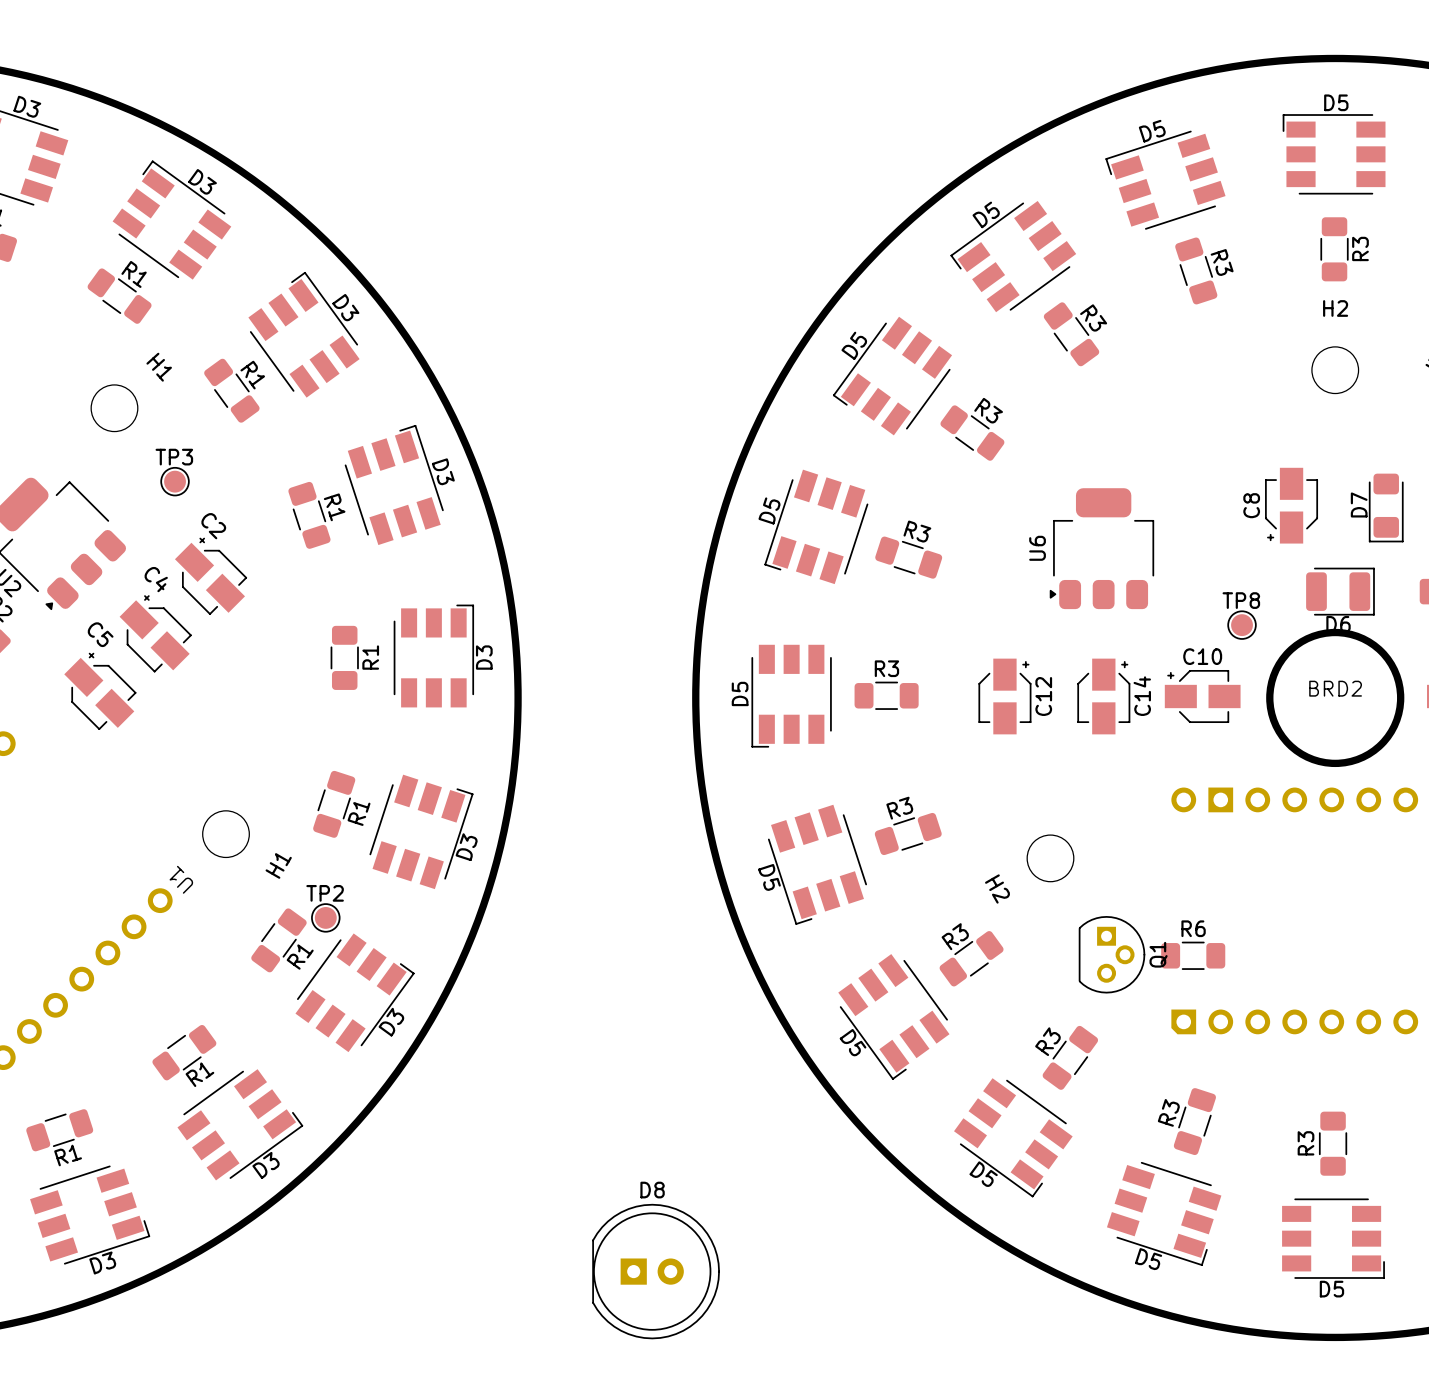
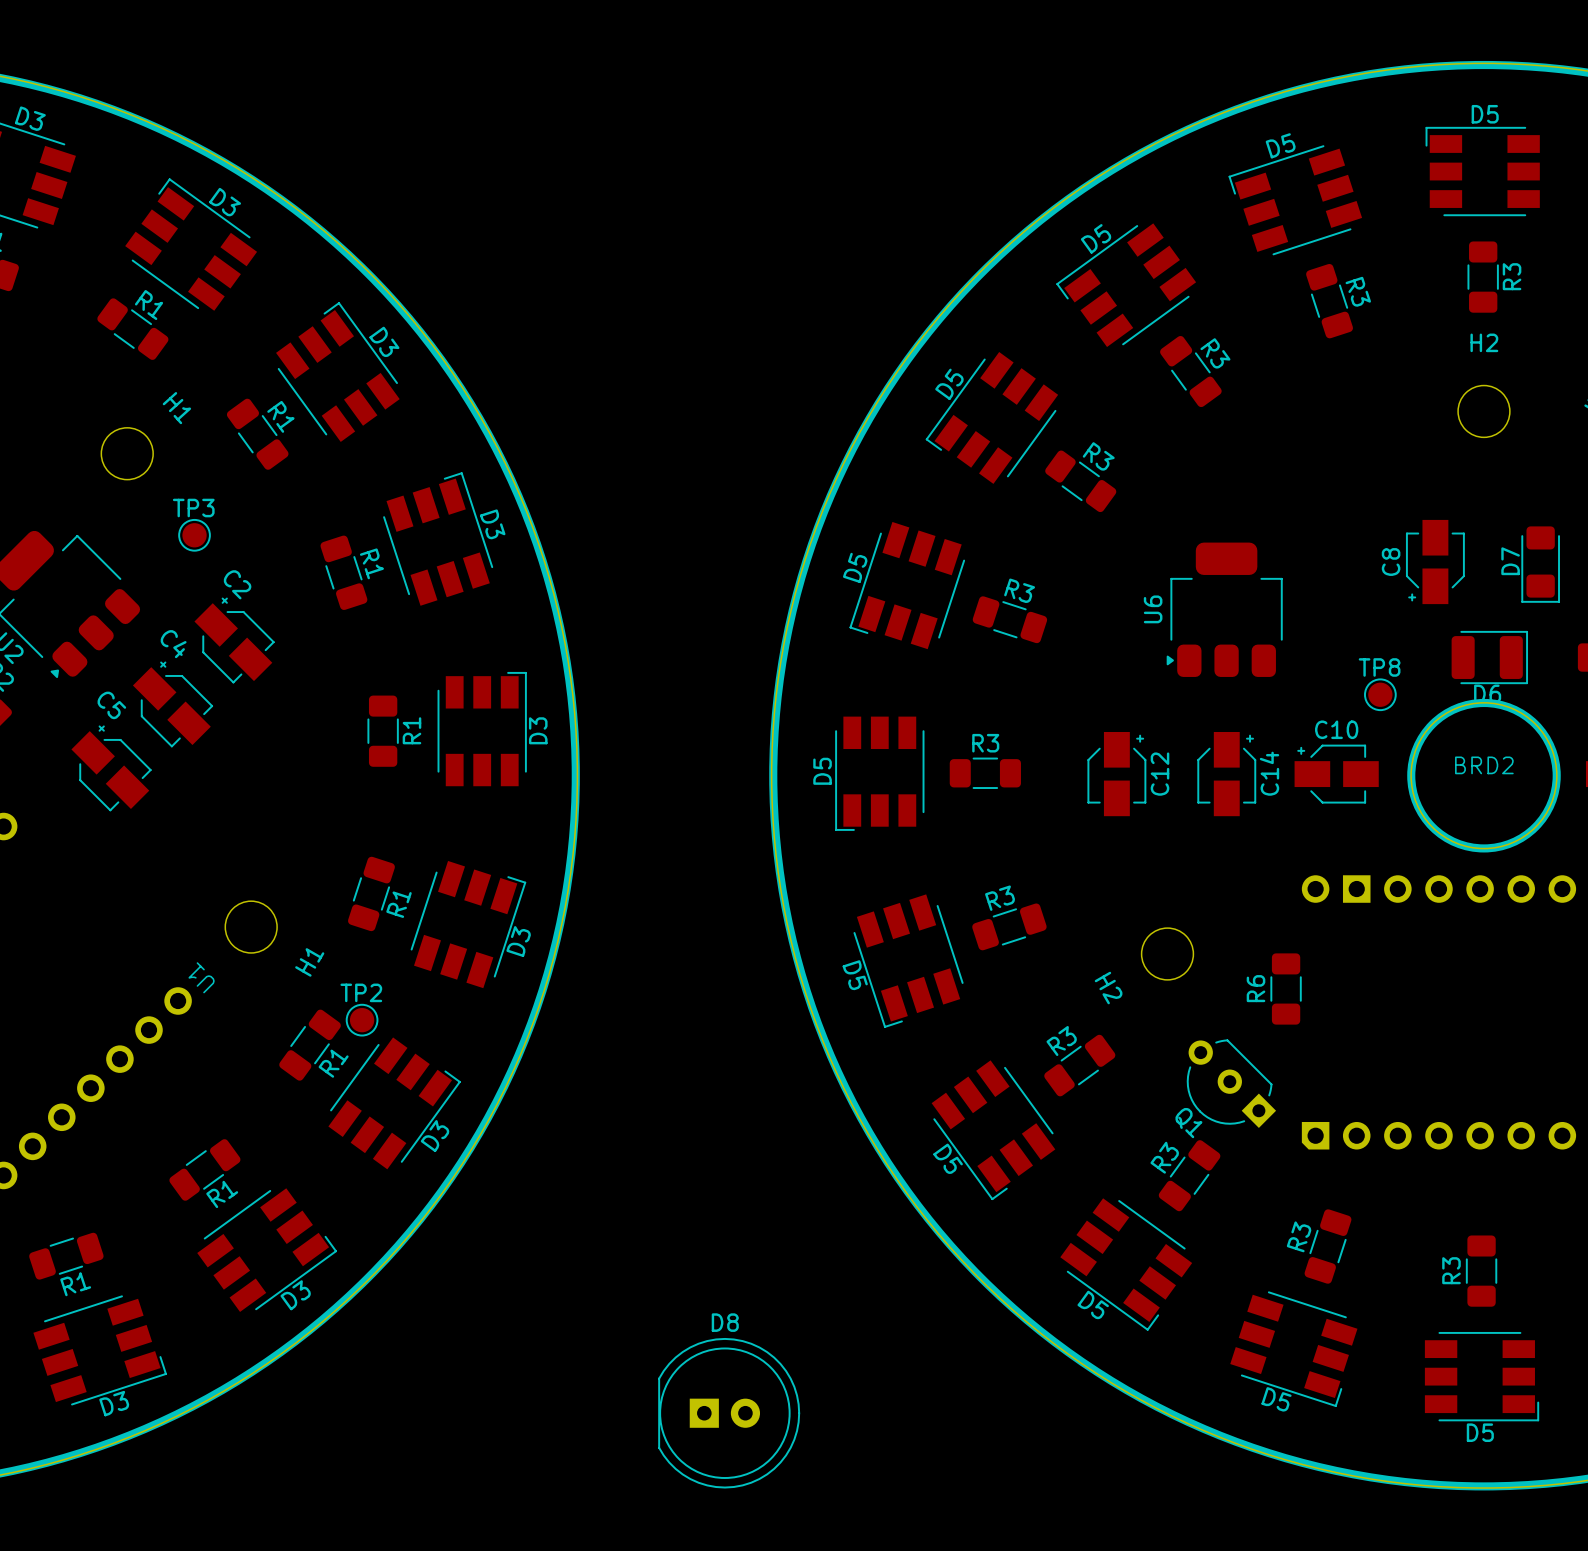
Q1 footprint: [1078, 916, 1146, 994] -> [1186, 1039, 1277, 1128]
R6 name position: R6 (1193, 928) -> R6 (1256, 988)
Q1 name position: Q1 (1158, 954) -> Q1 (1188, 1123)
R6 rotation: 0° (1193, 955) -> 90° clockwise (1286, 988)
R6 position: (1193, 955) -> (1286, 988)

